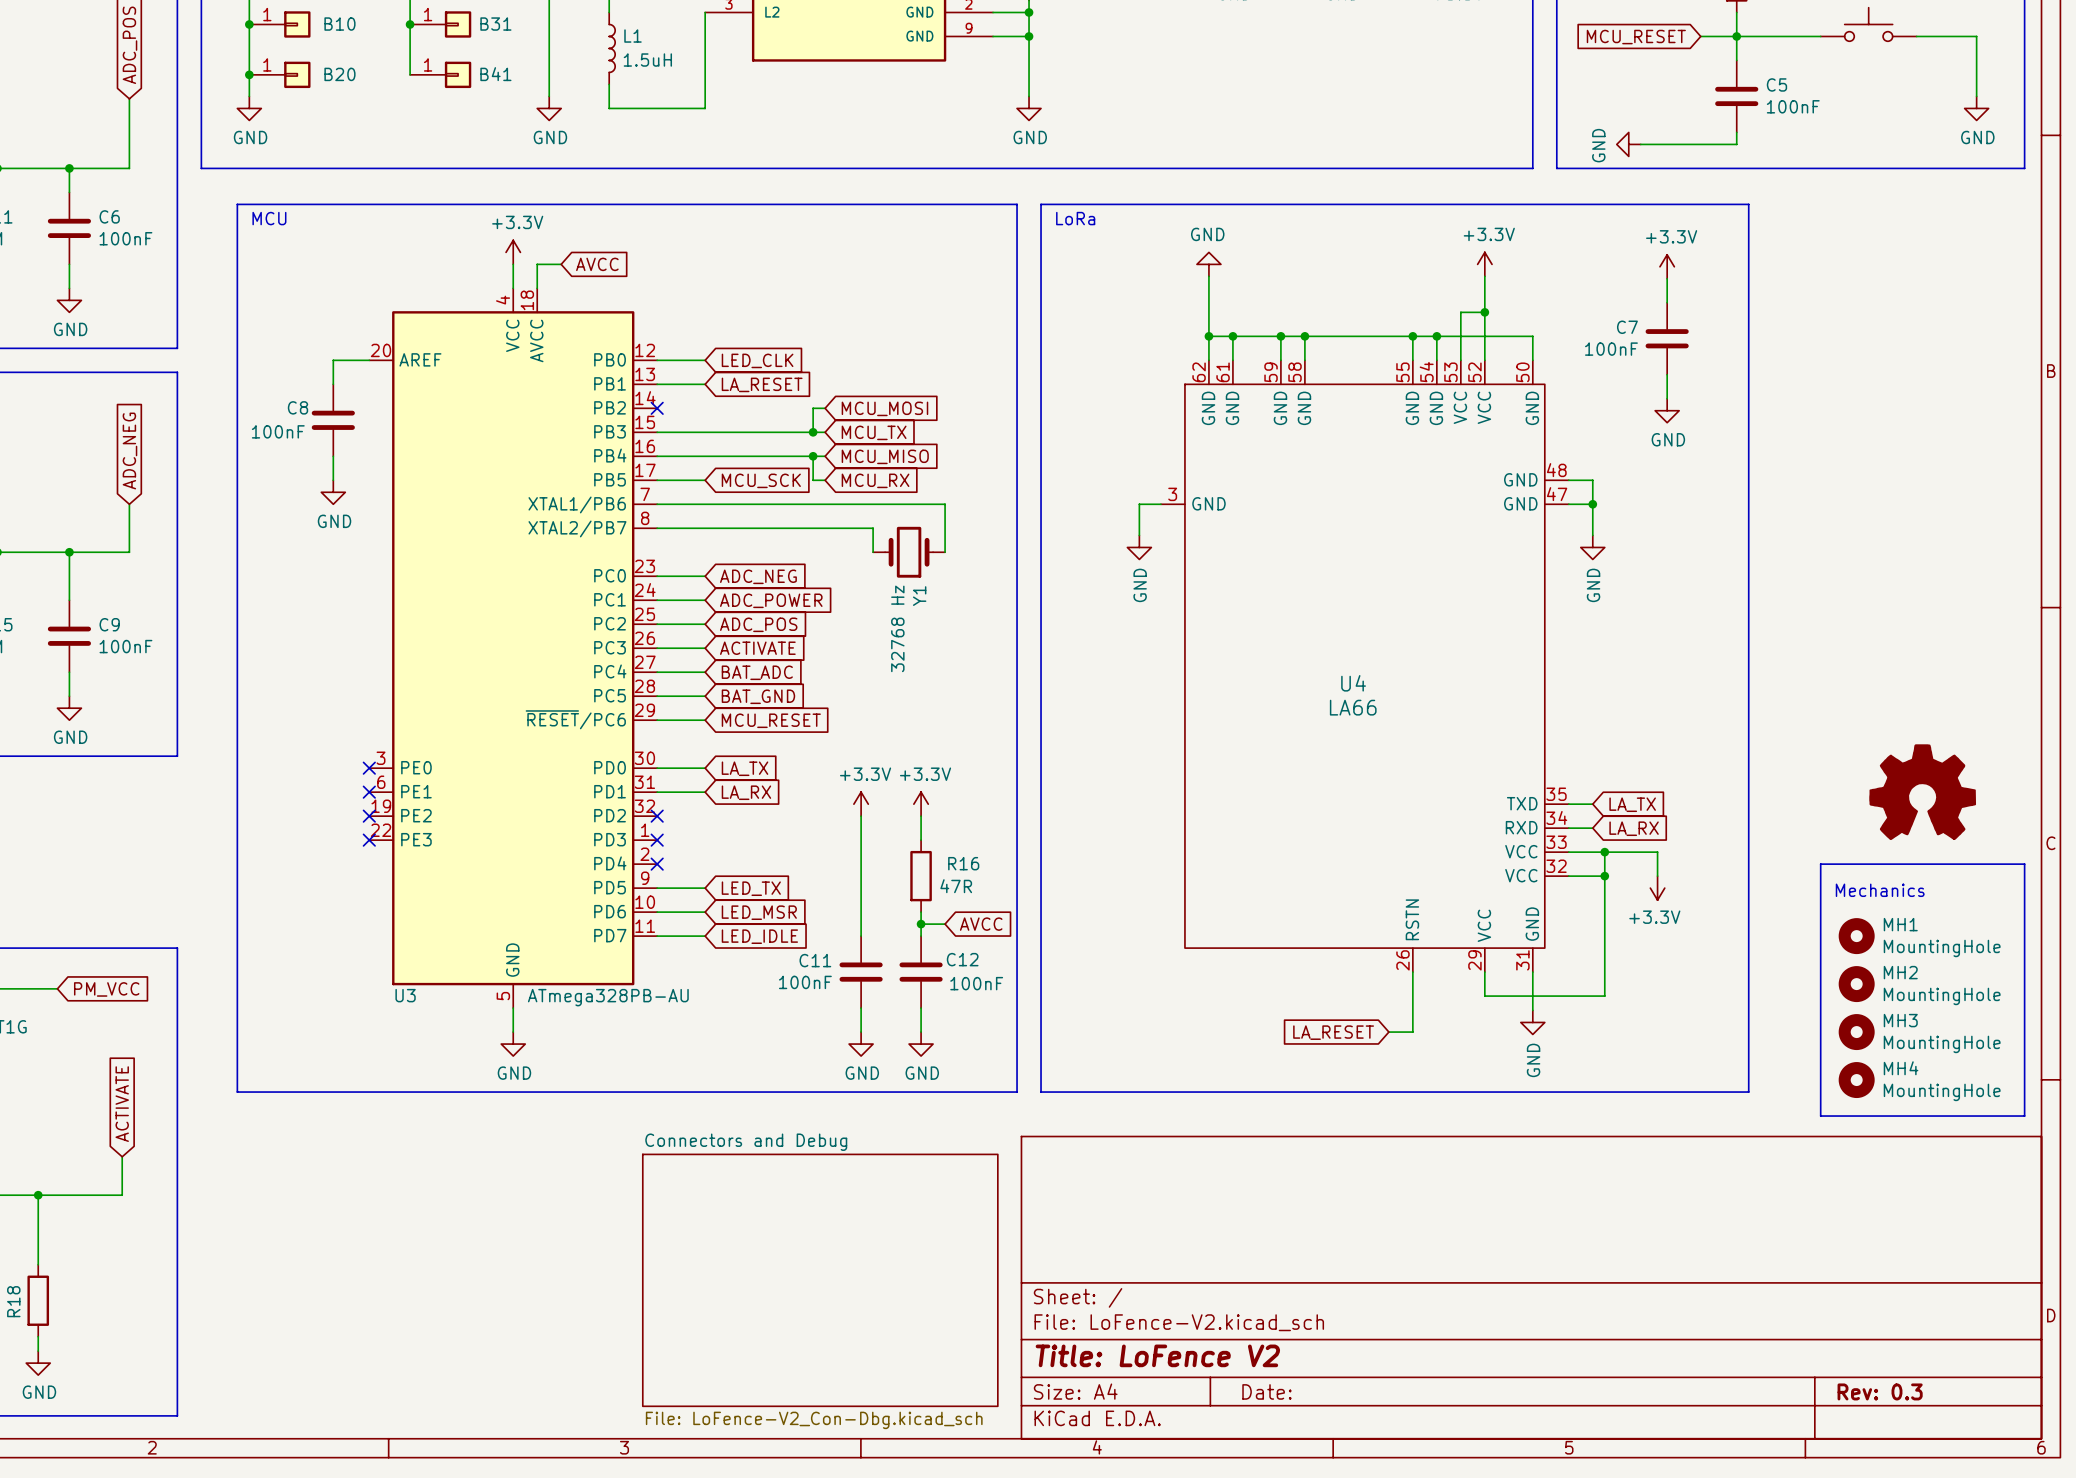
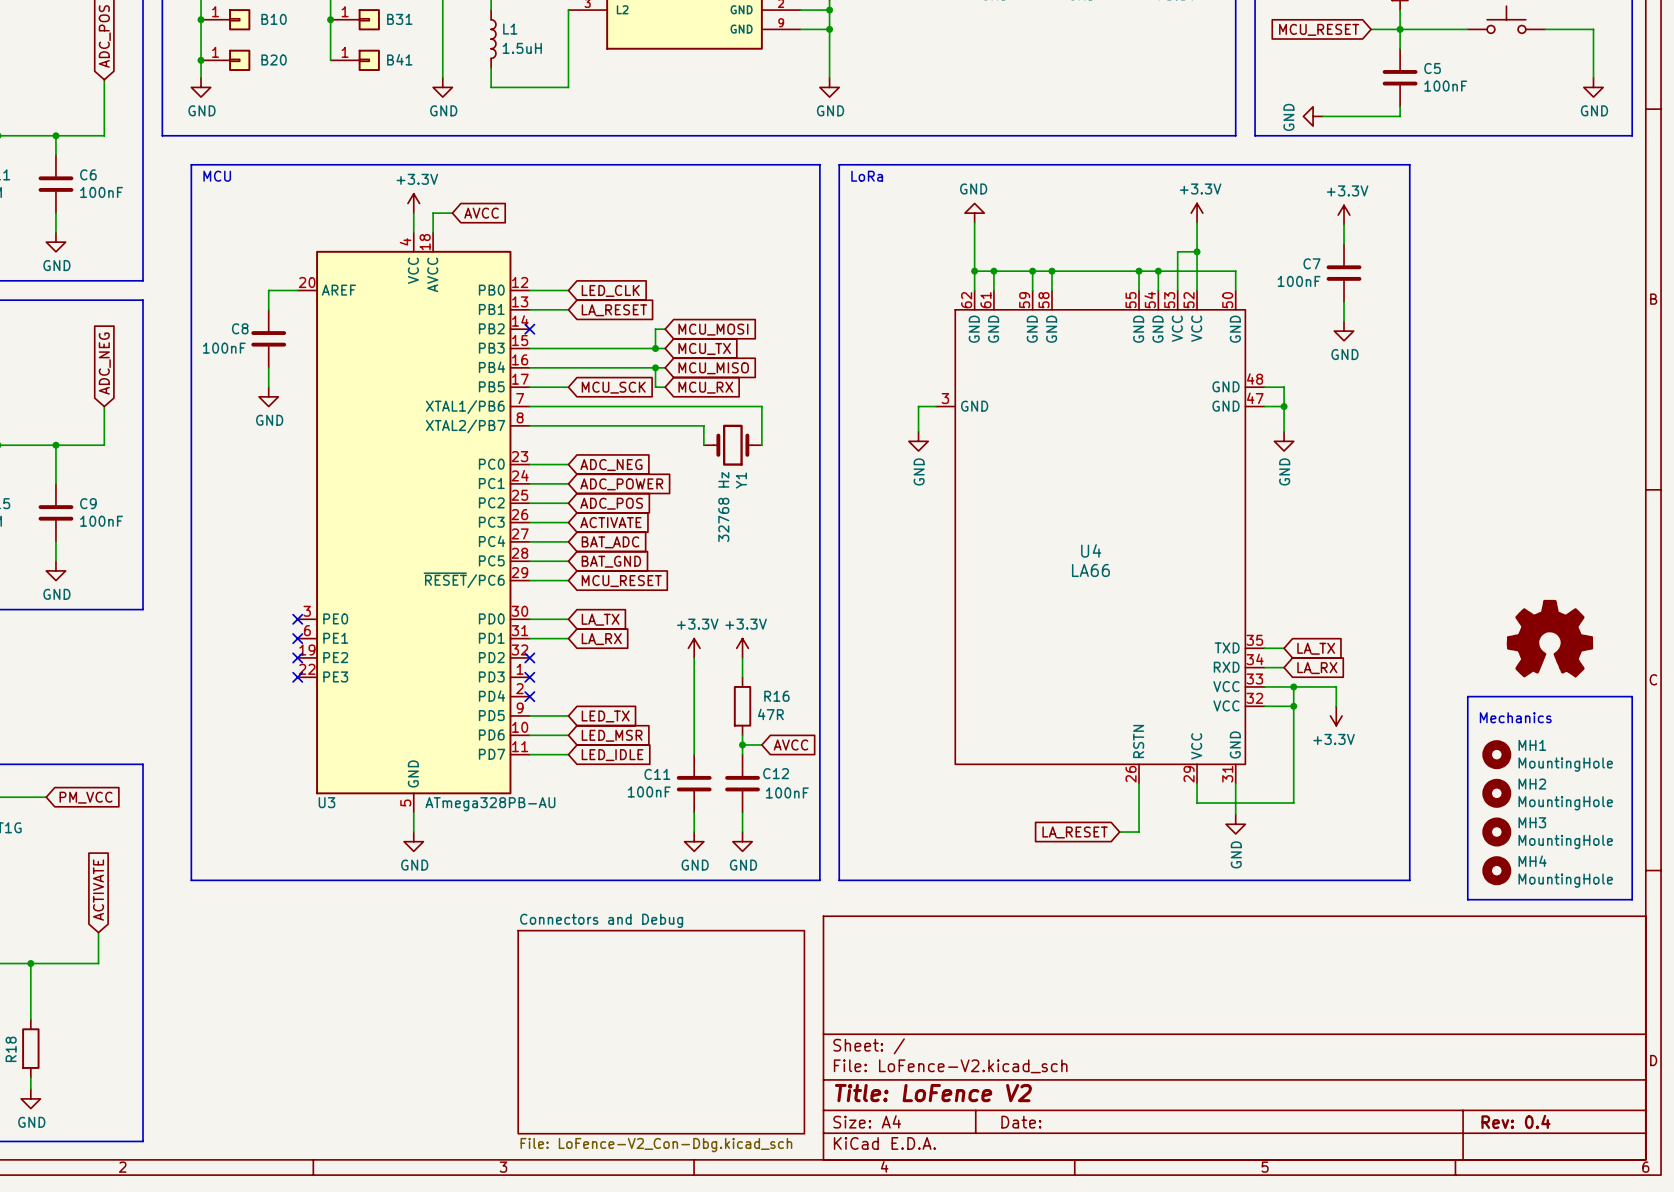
title block: Rev: 0.3 (1880, 1391) -> Rev: 0.4 (1515, 1121)

